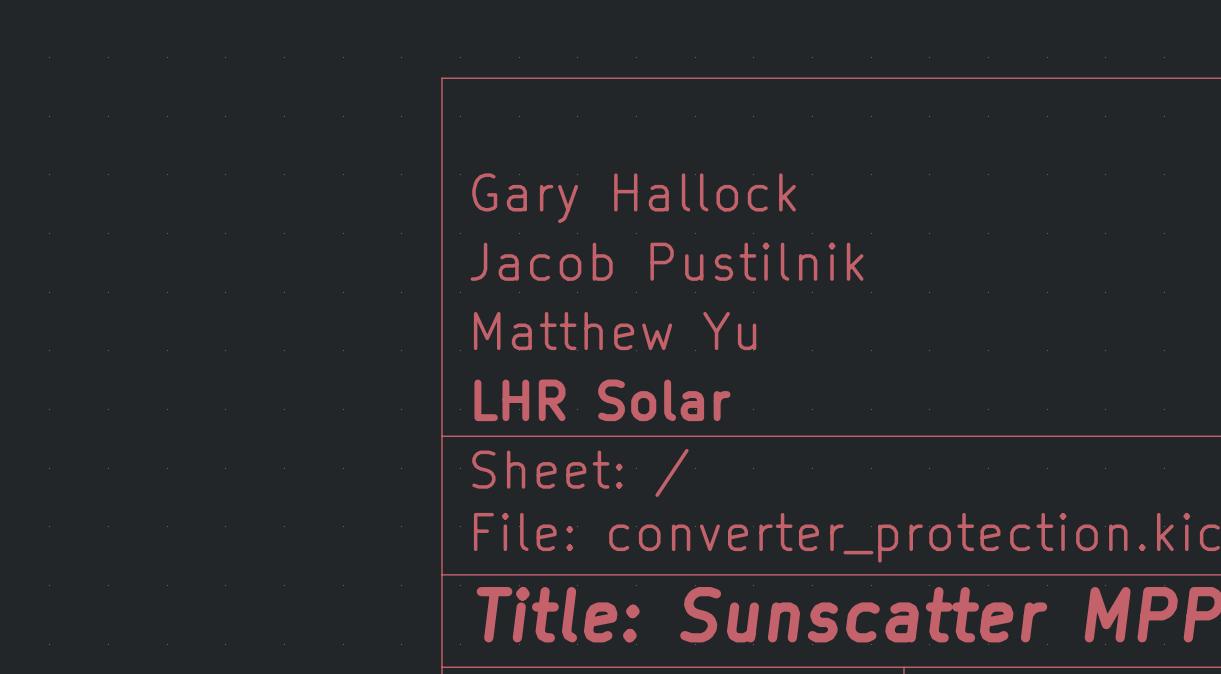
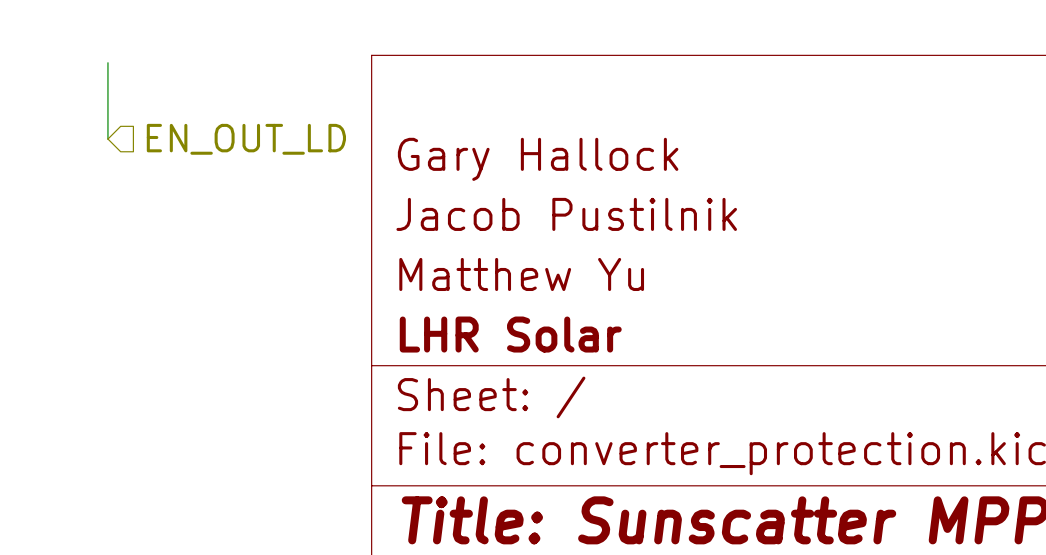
wire: none -> (107, 62) (107, 139)
hierarchical label: none -> EN_OUT_LD (246, 139)

